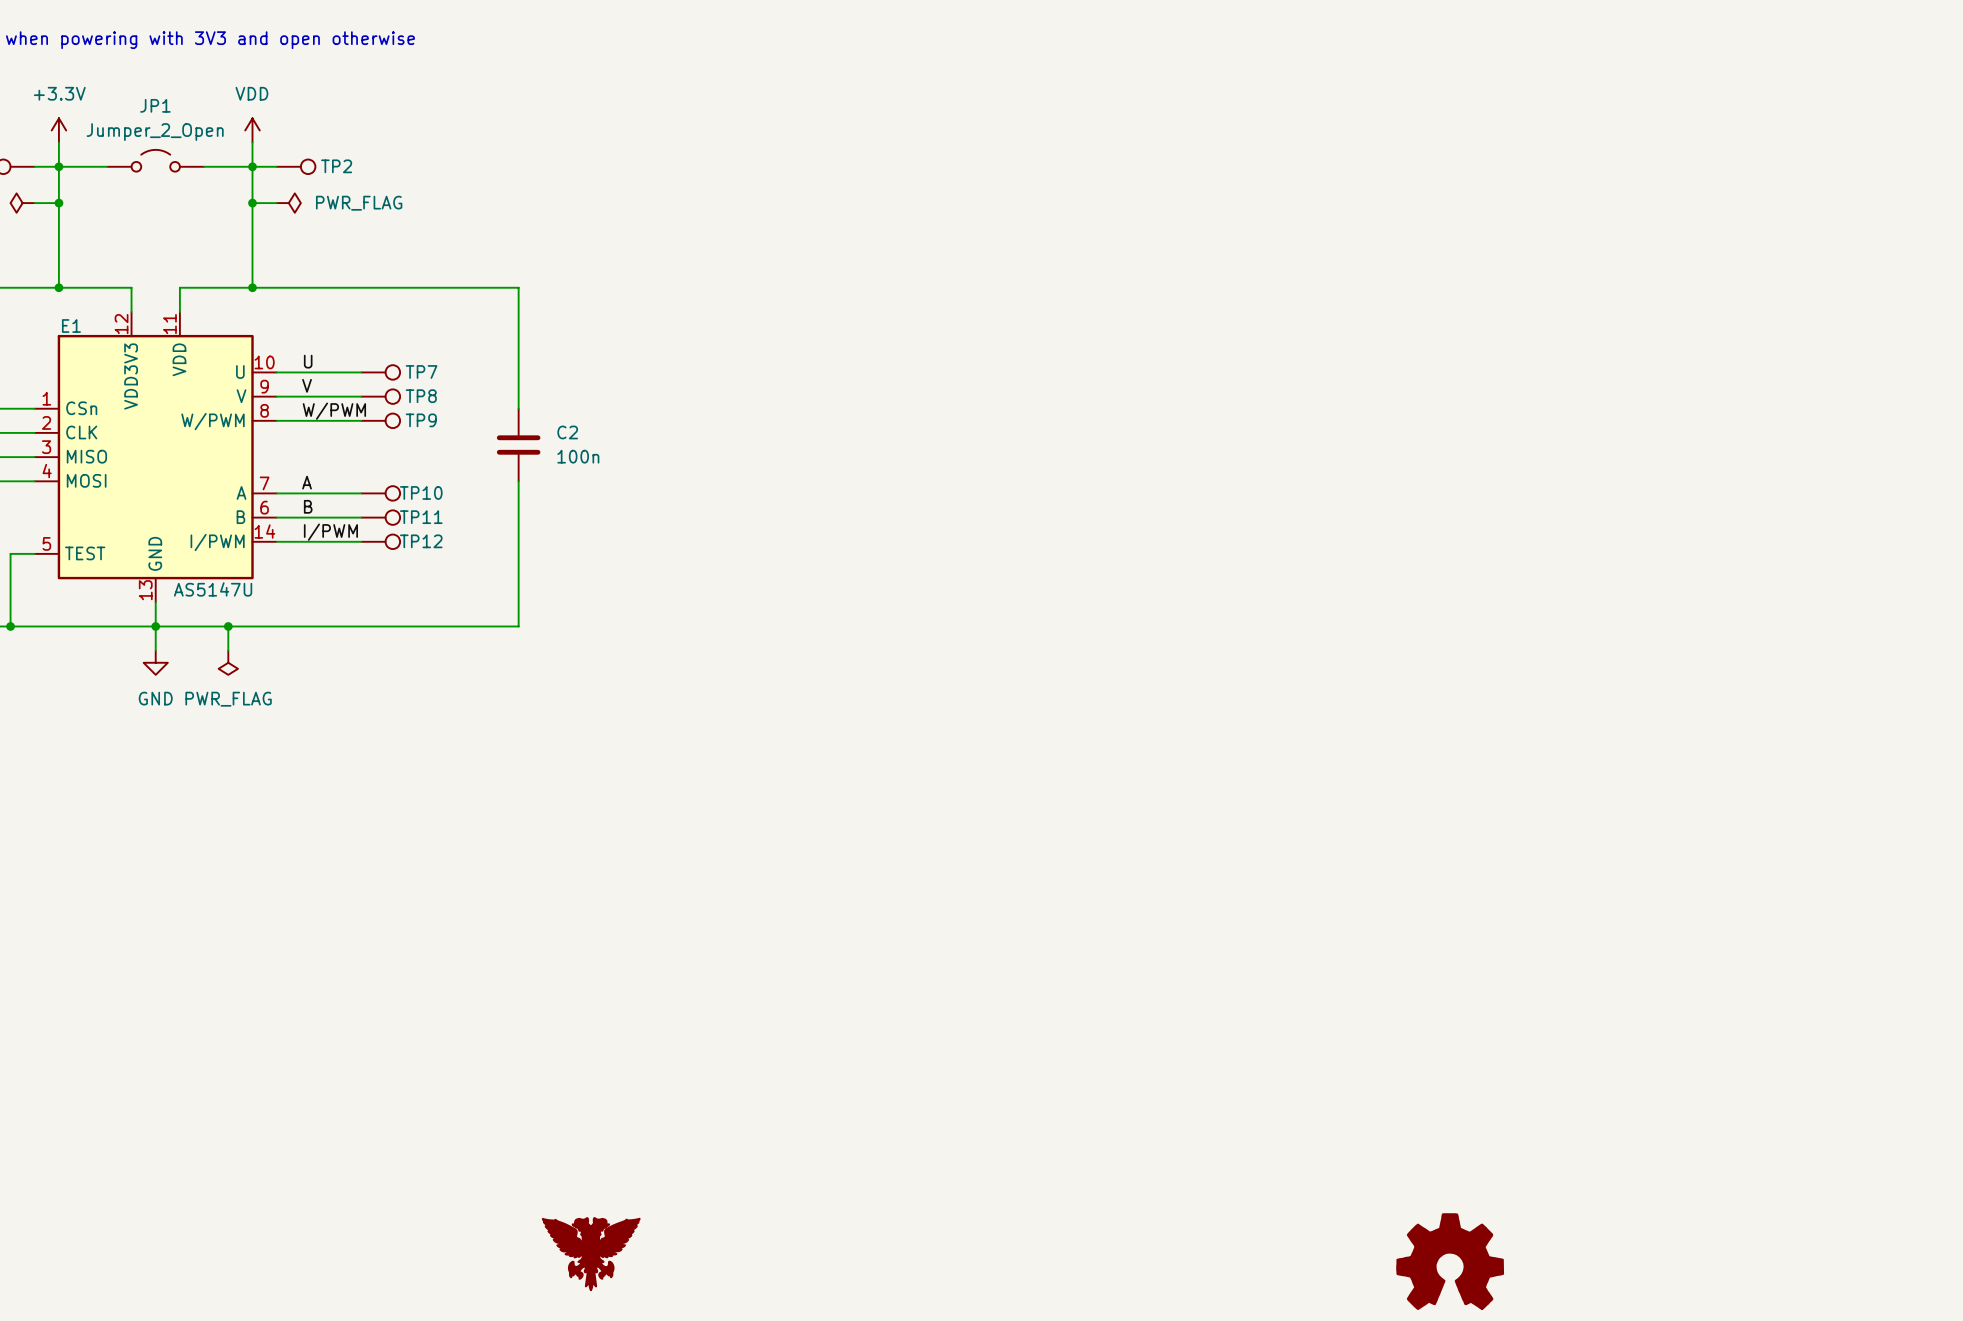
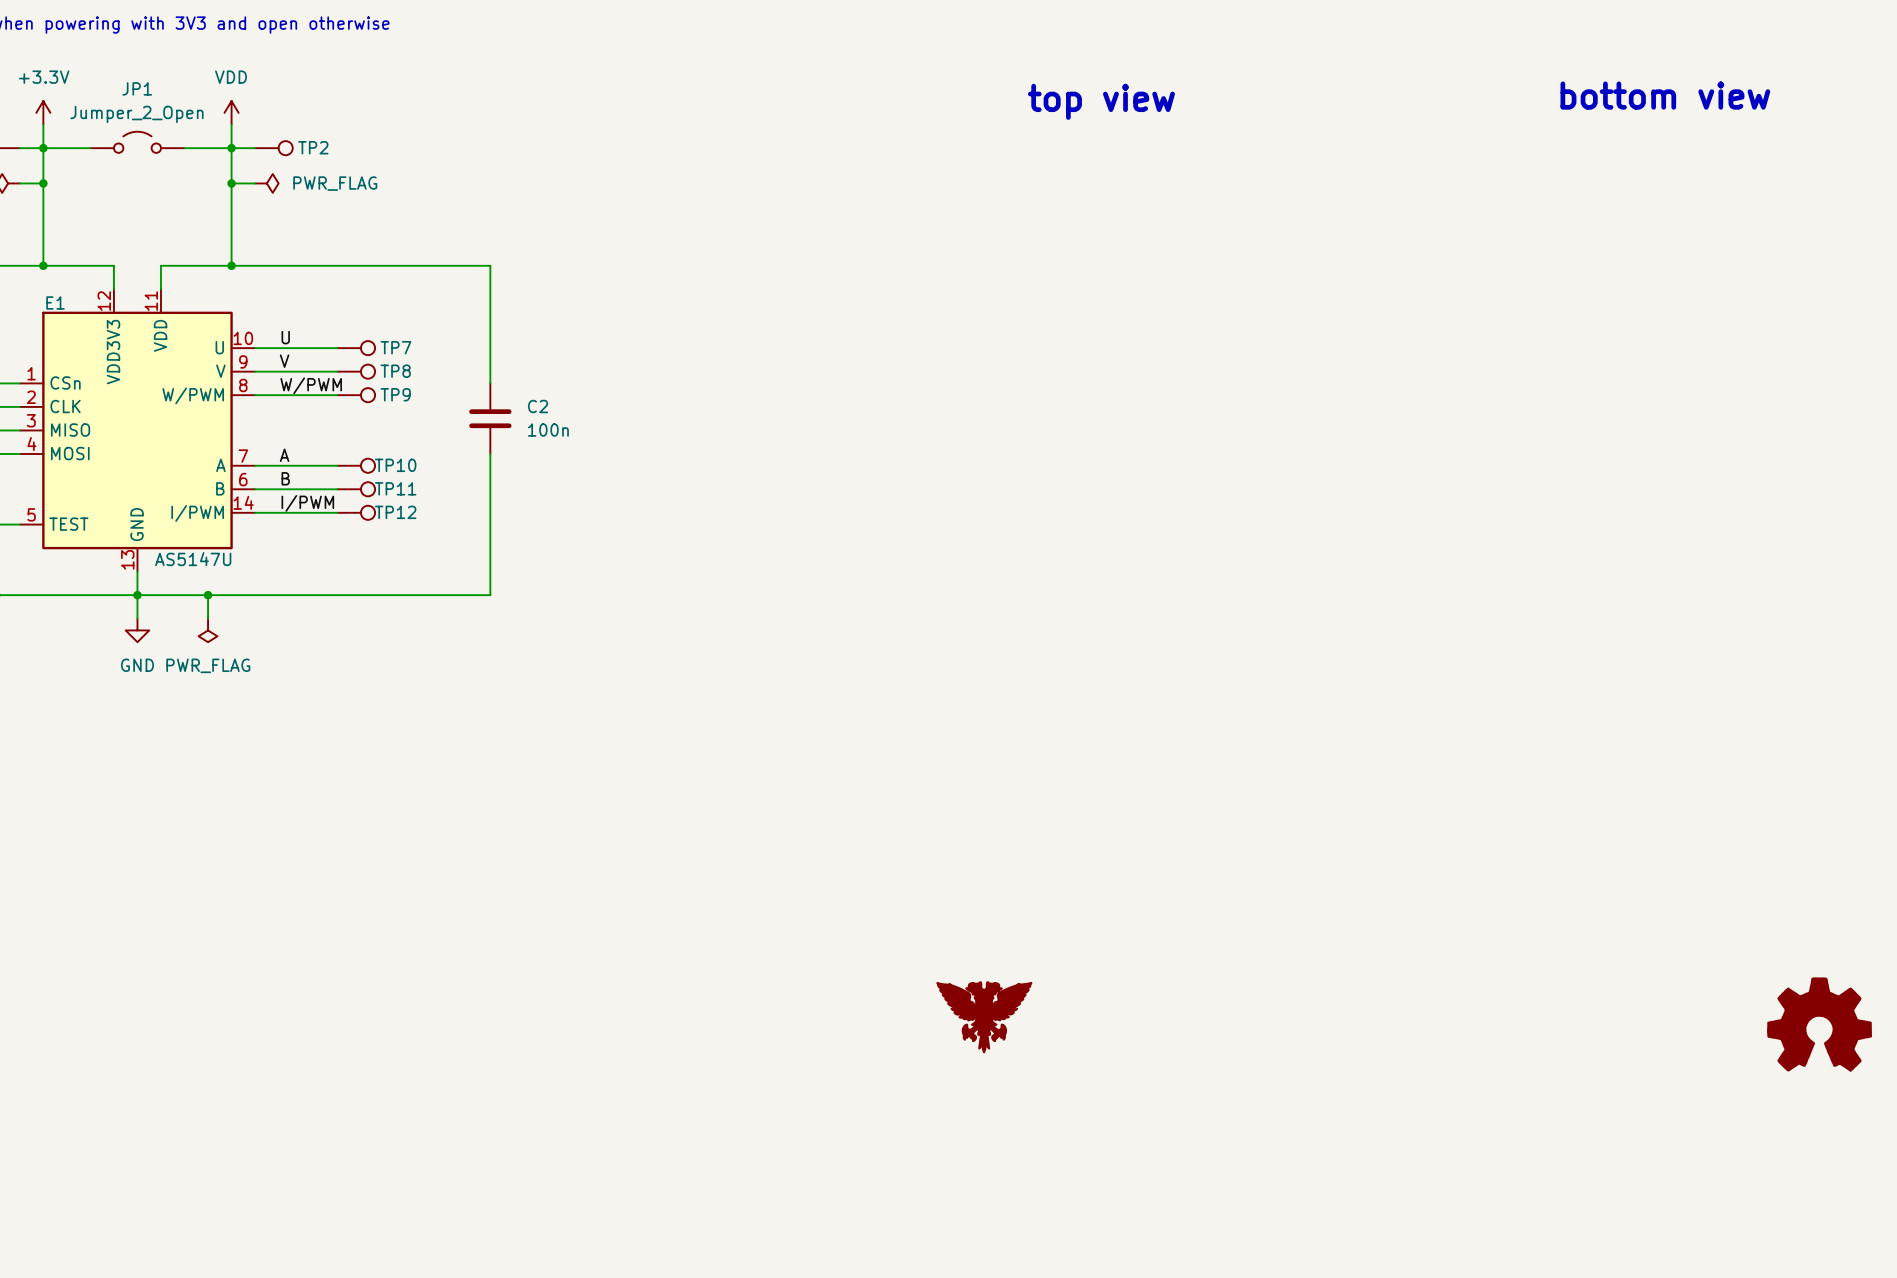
text: none -> bottom view (1665, 95)
text: none -> top view (1101, 101)
power symbol: none -> (984, 1017)
power symbol: none -> (1819, 1024)
power symbol: (591, 1254) -> none
power symbol: (1450, 1261) -> none

